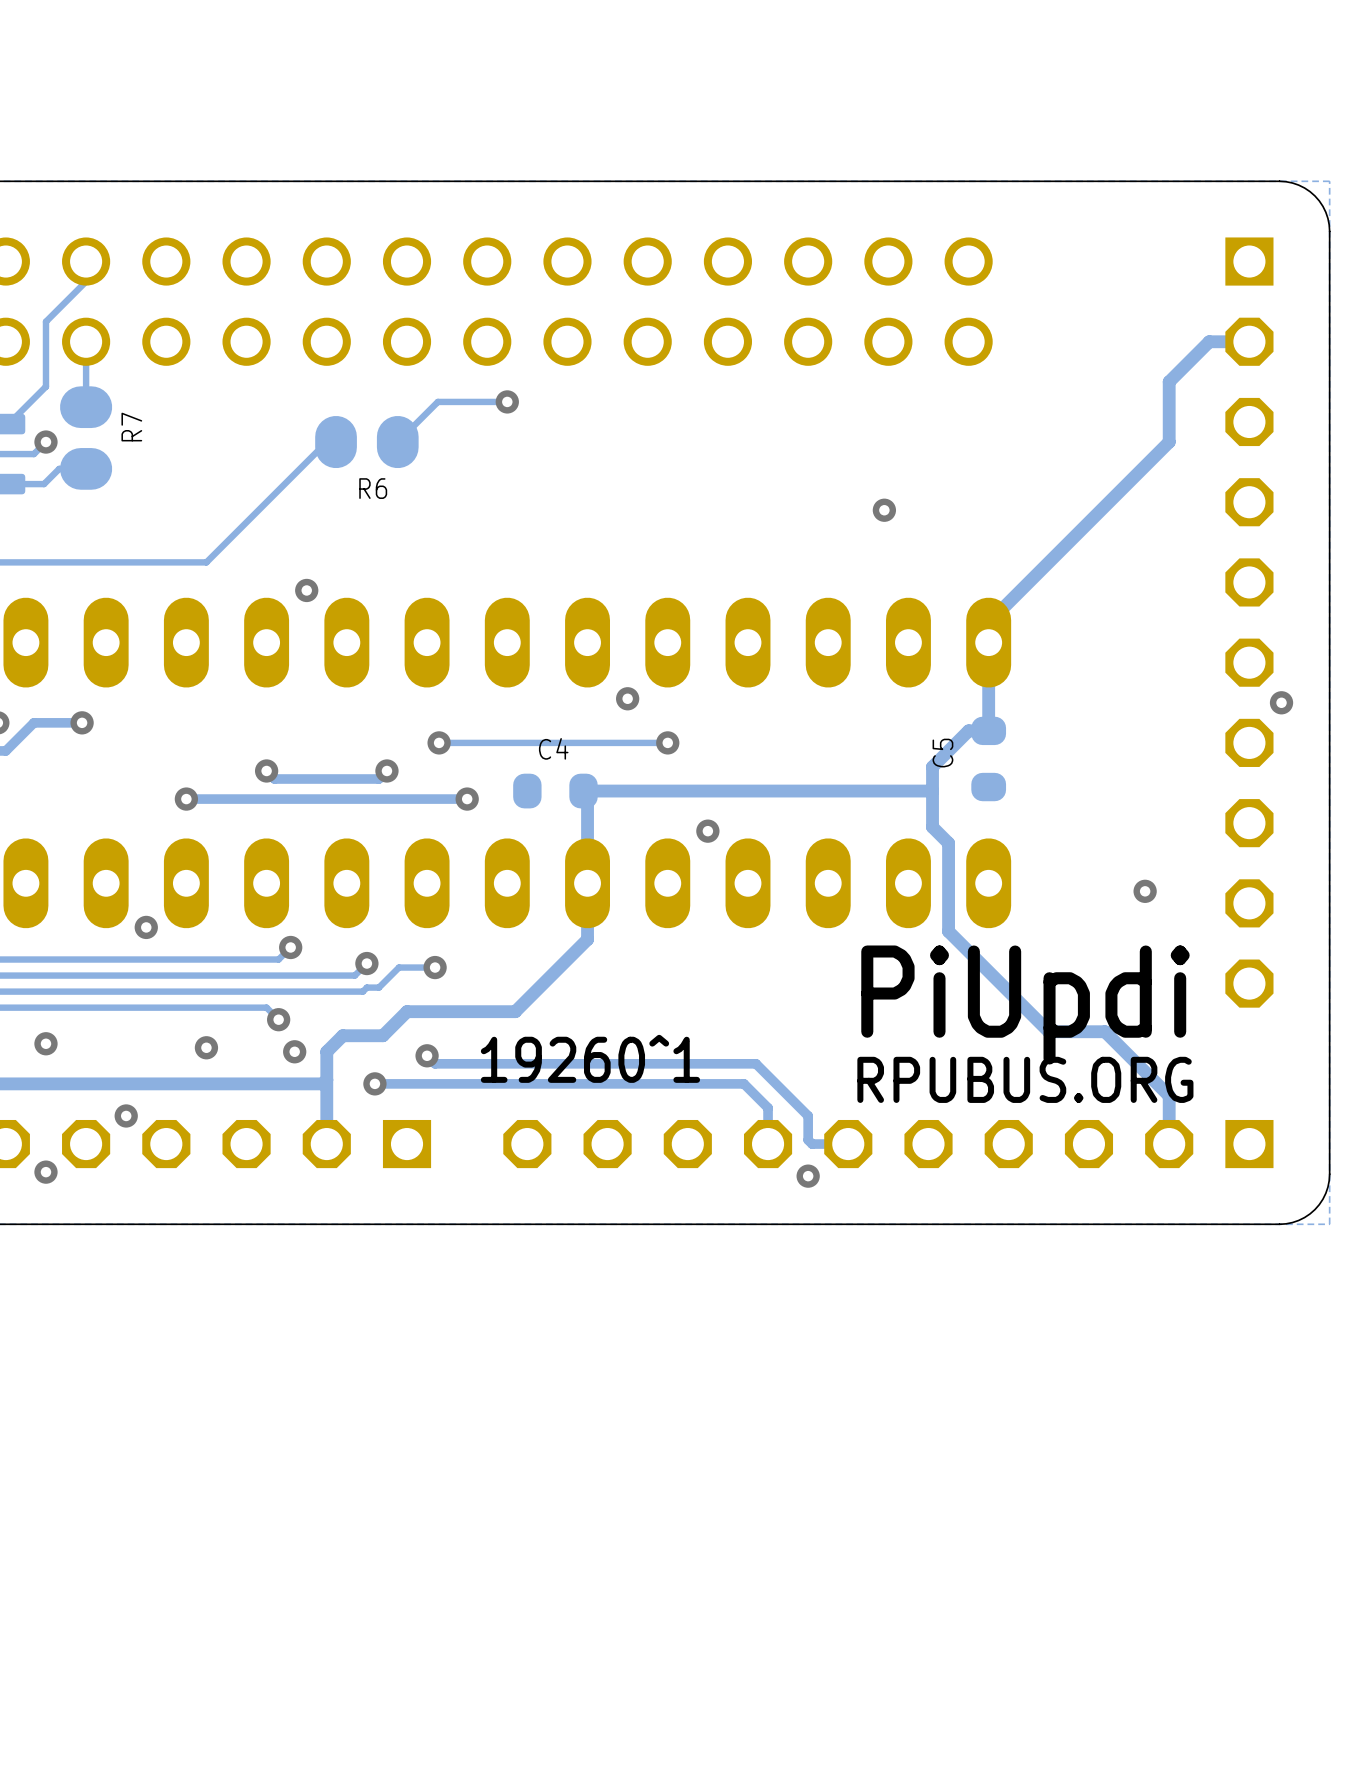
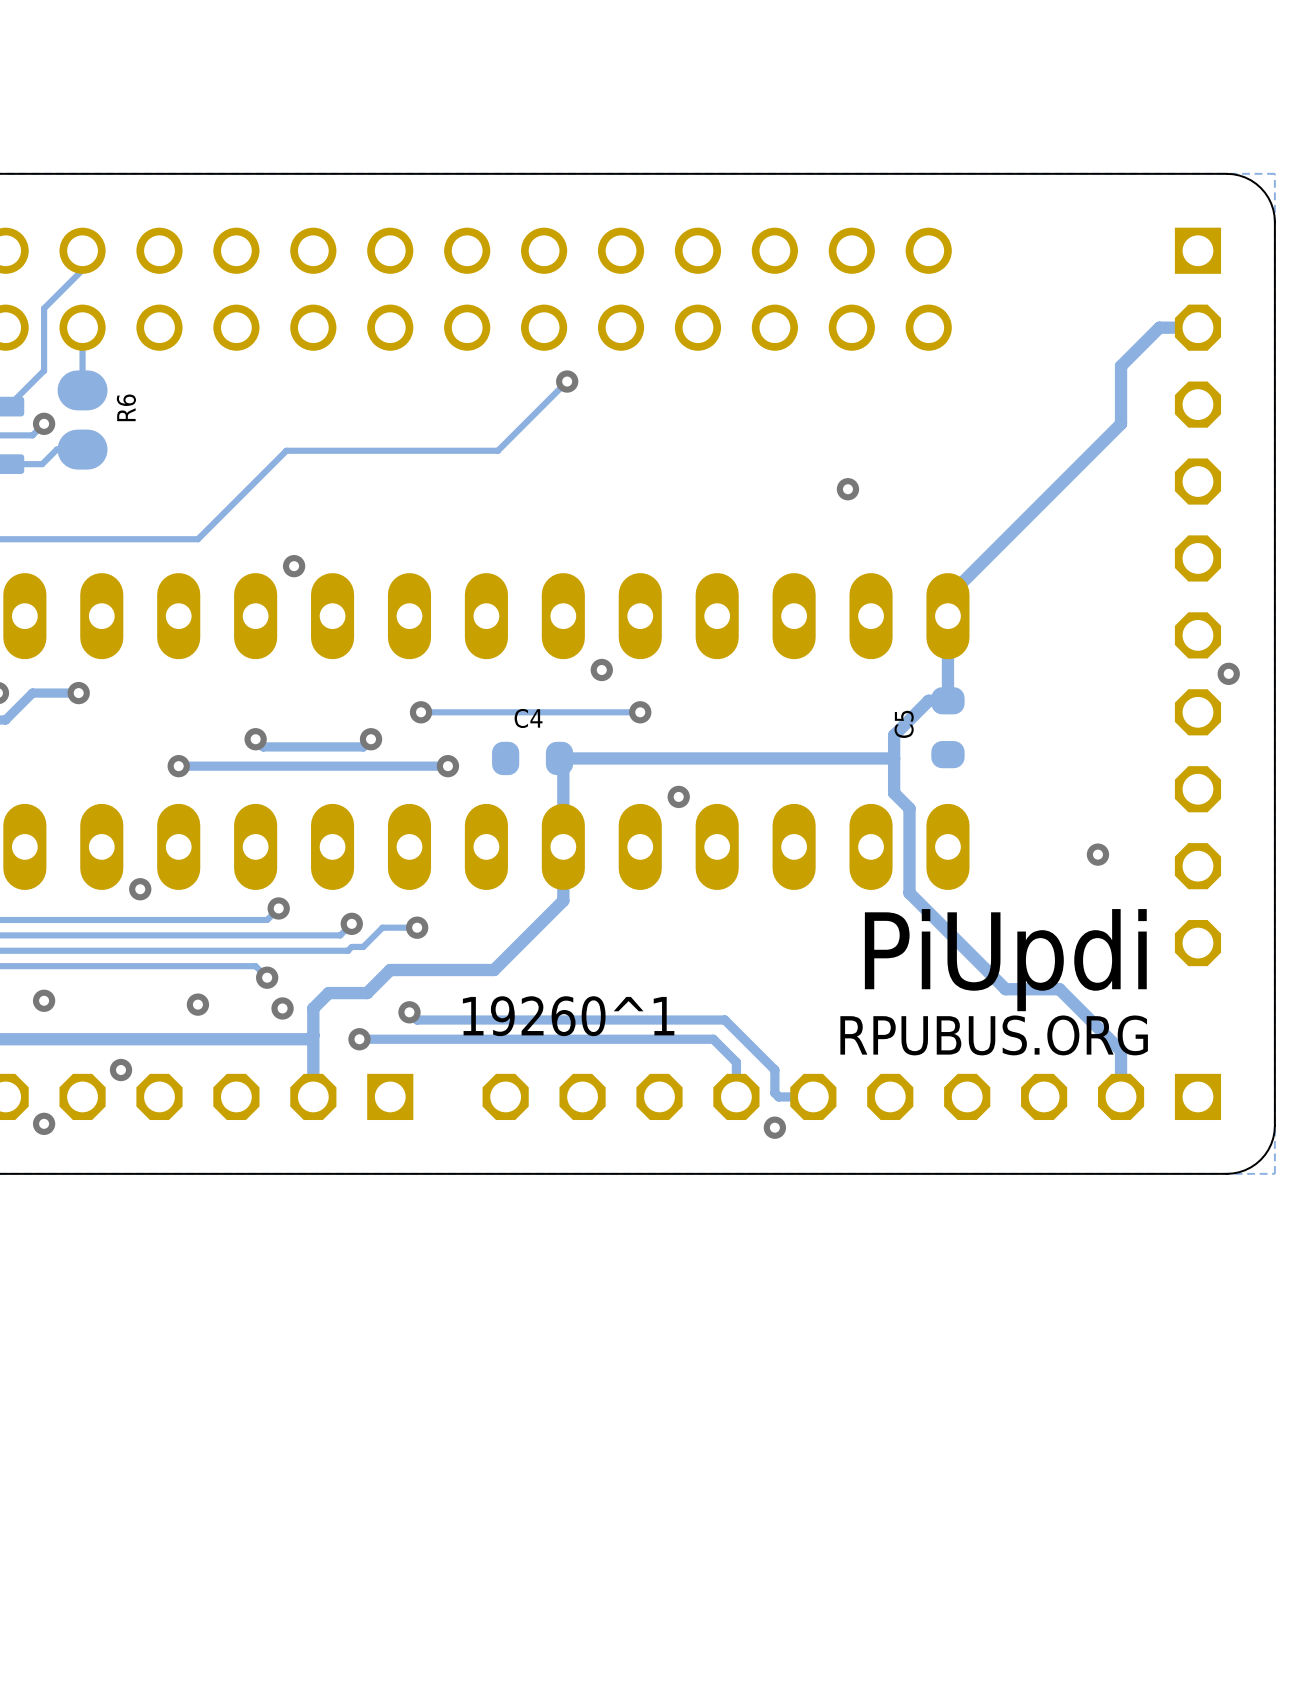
track: (507, 401) (437, 401) (397, 442) -> none
via position: (507, 401) -> (567, 381)
R7 name: R7 (131, 427) -> R6 (126, 407)
track: (336, 442) (326, 442) (298, 470) -> (567, 381) (497, 450) (286, 450)
R6: (366, 442) -> none

